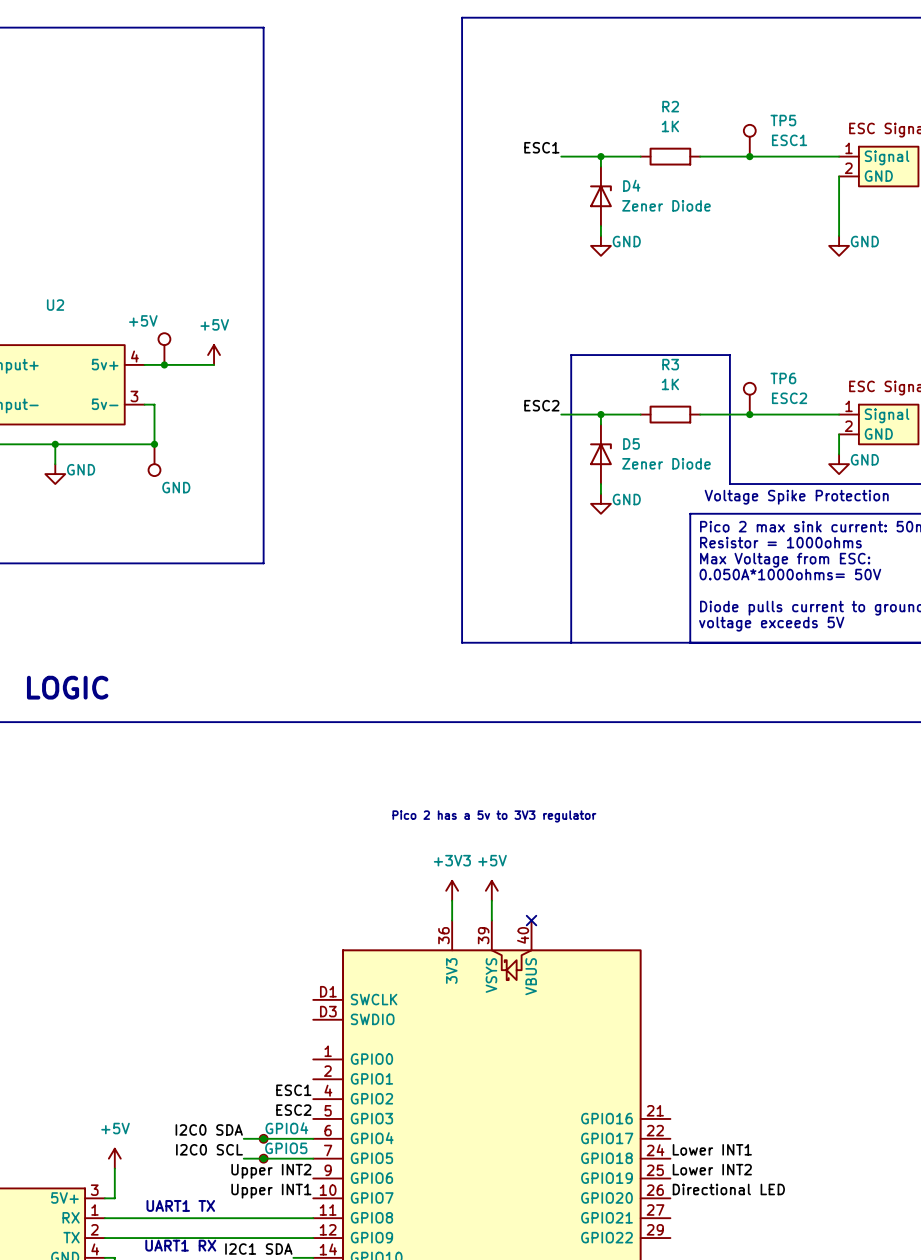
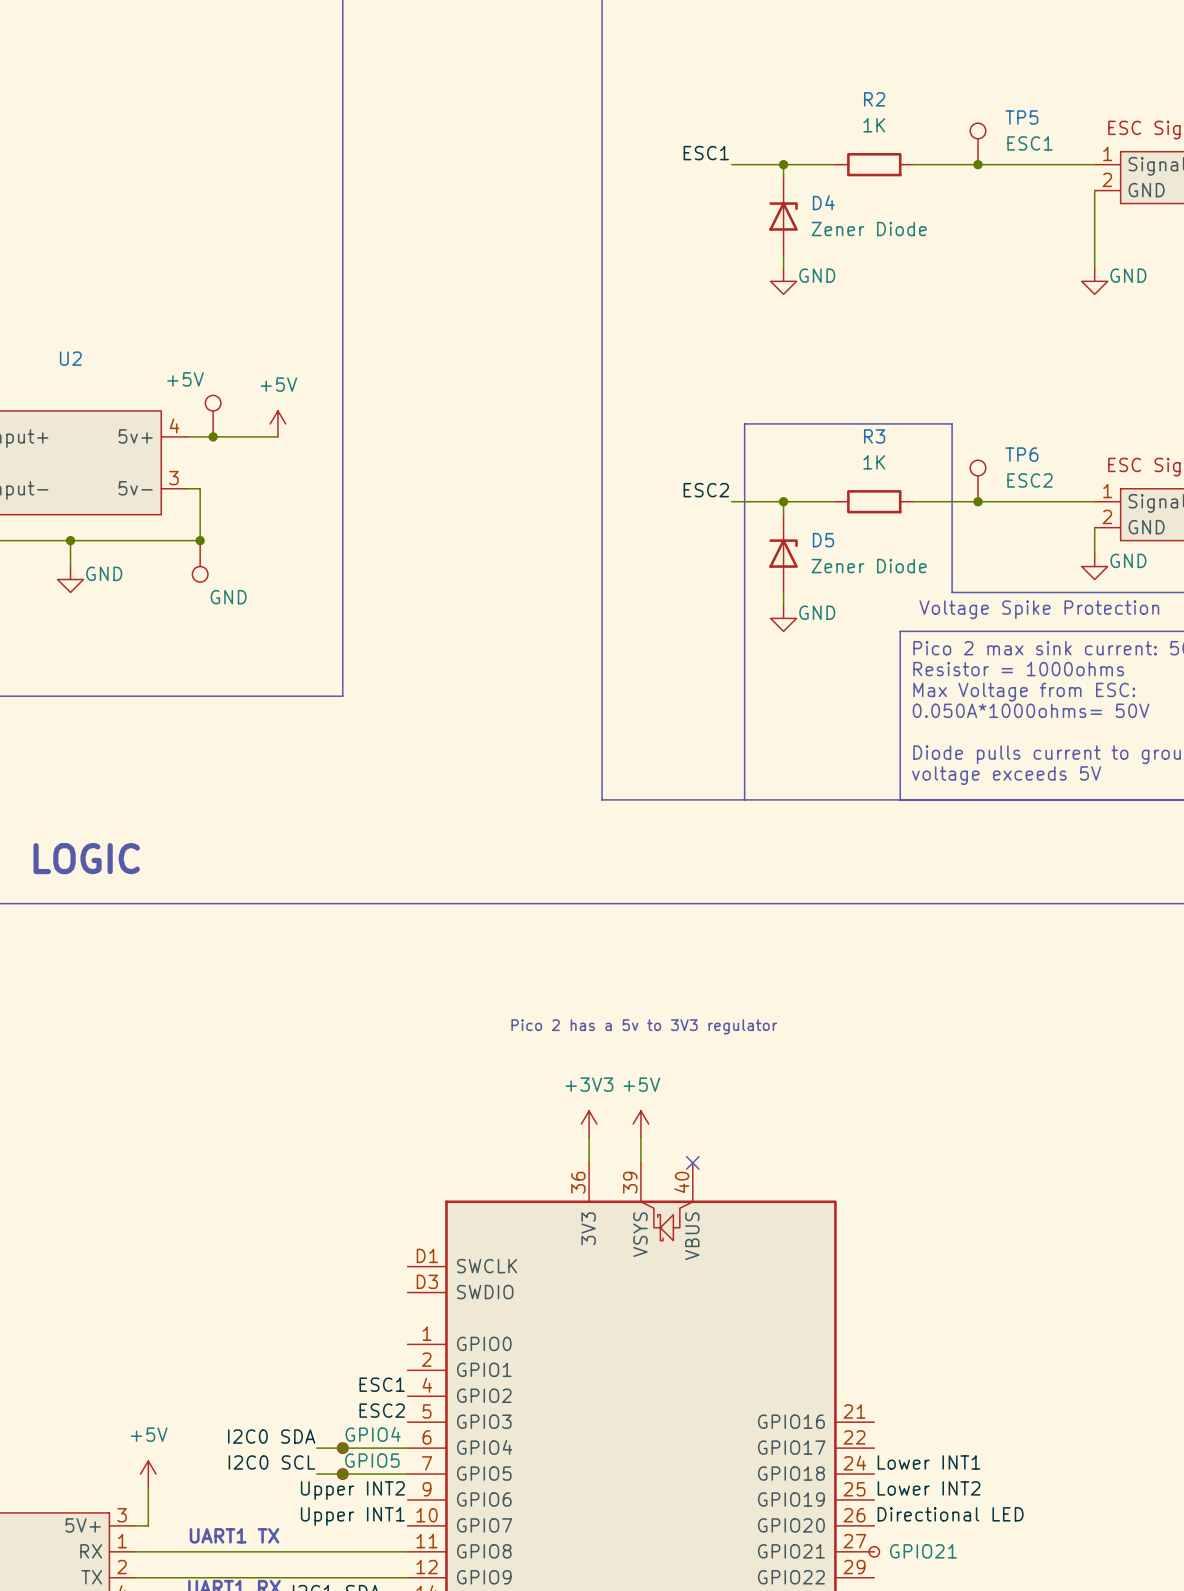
part: none -> GPIO21 (874, 1551)

